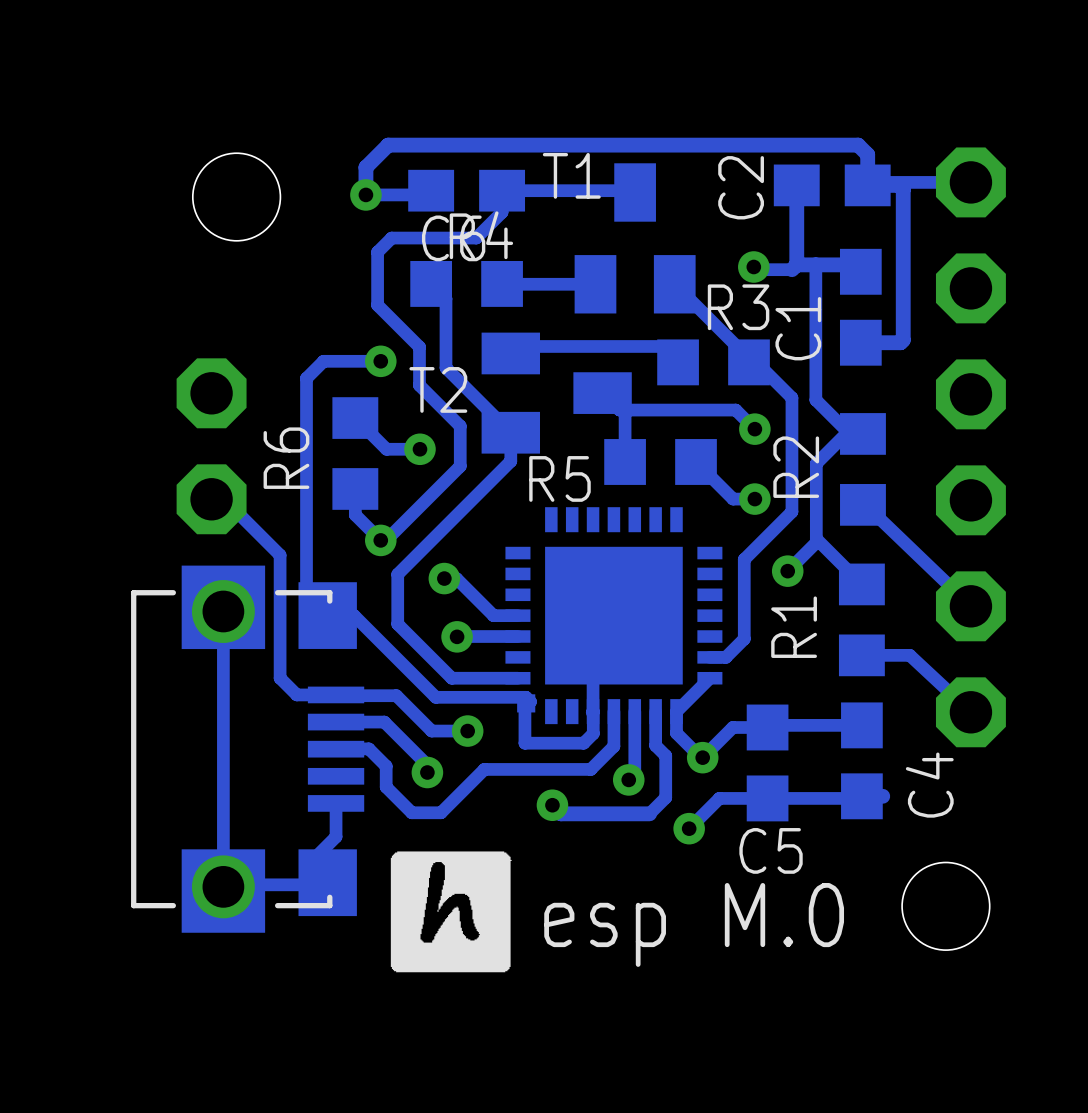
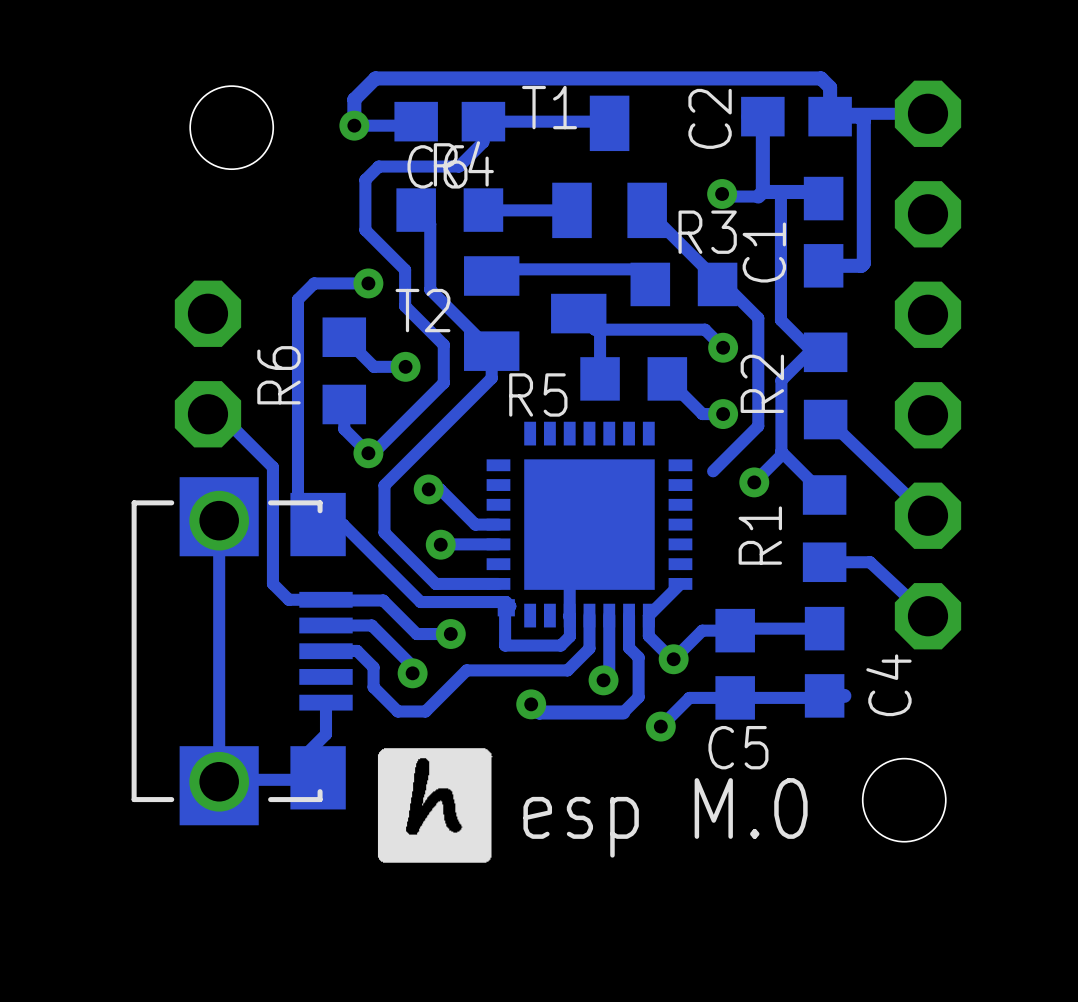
track: (744, 559) (744, 638) (725, 657) (709, 657) -> none

